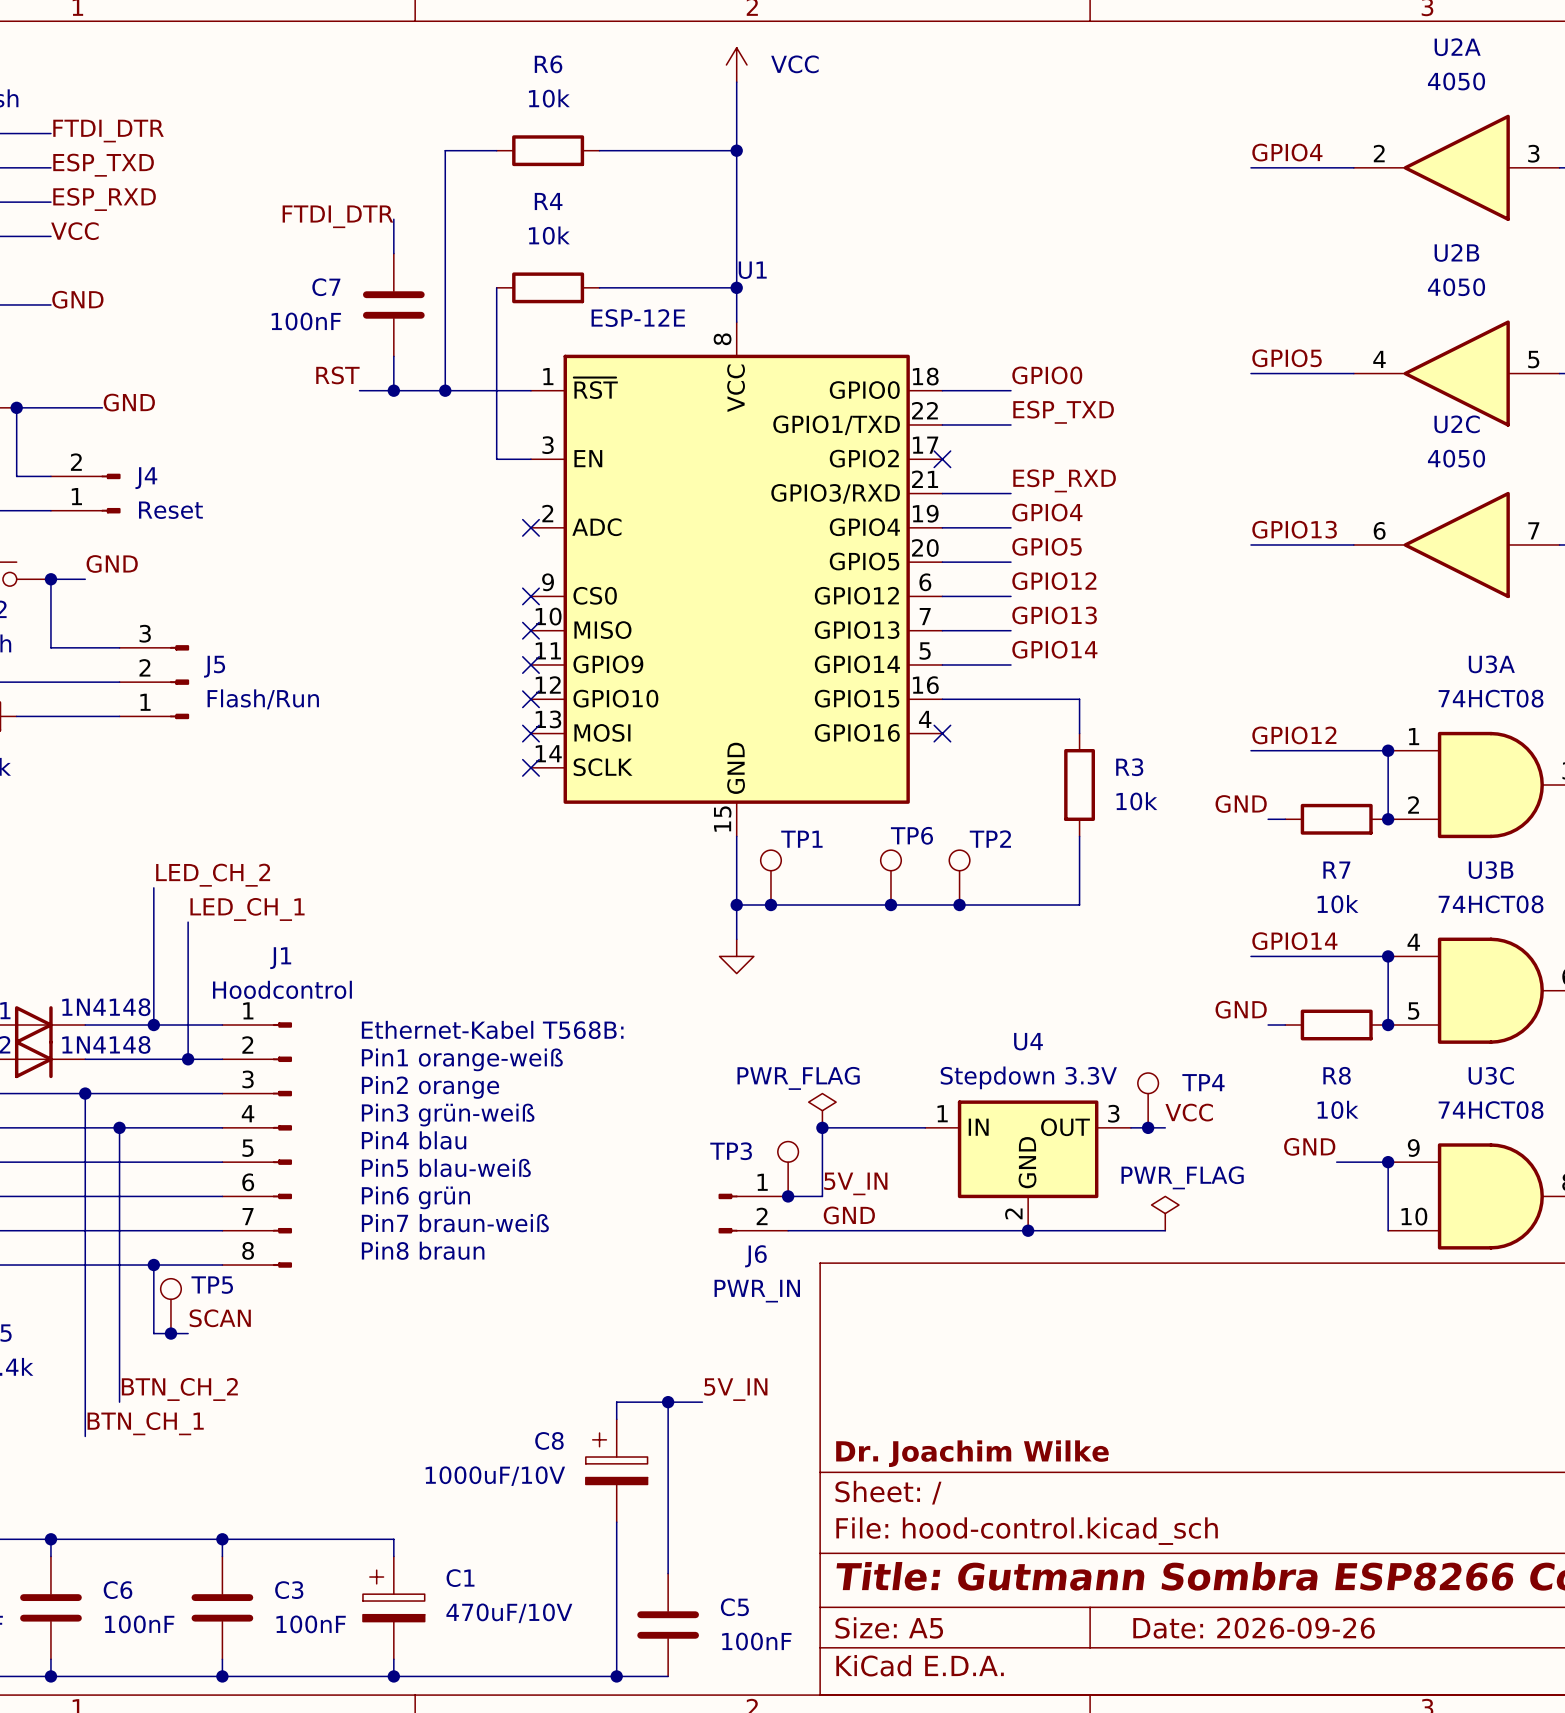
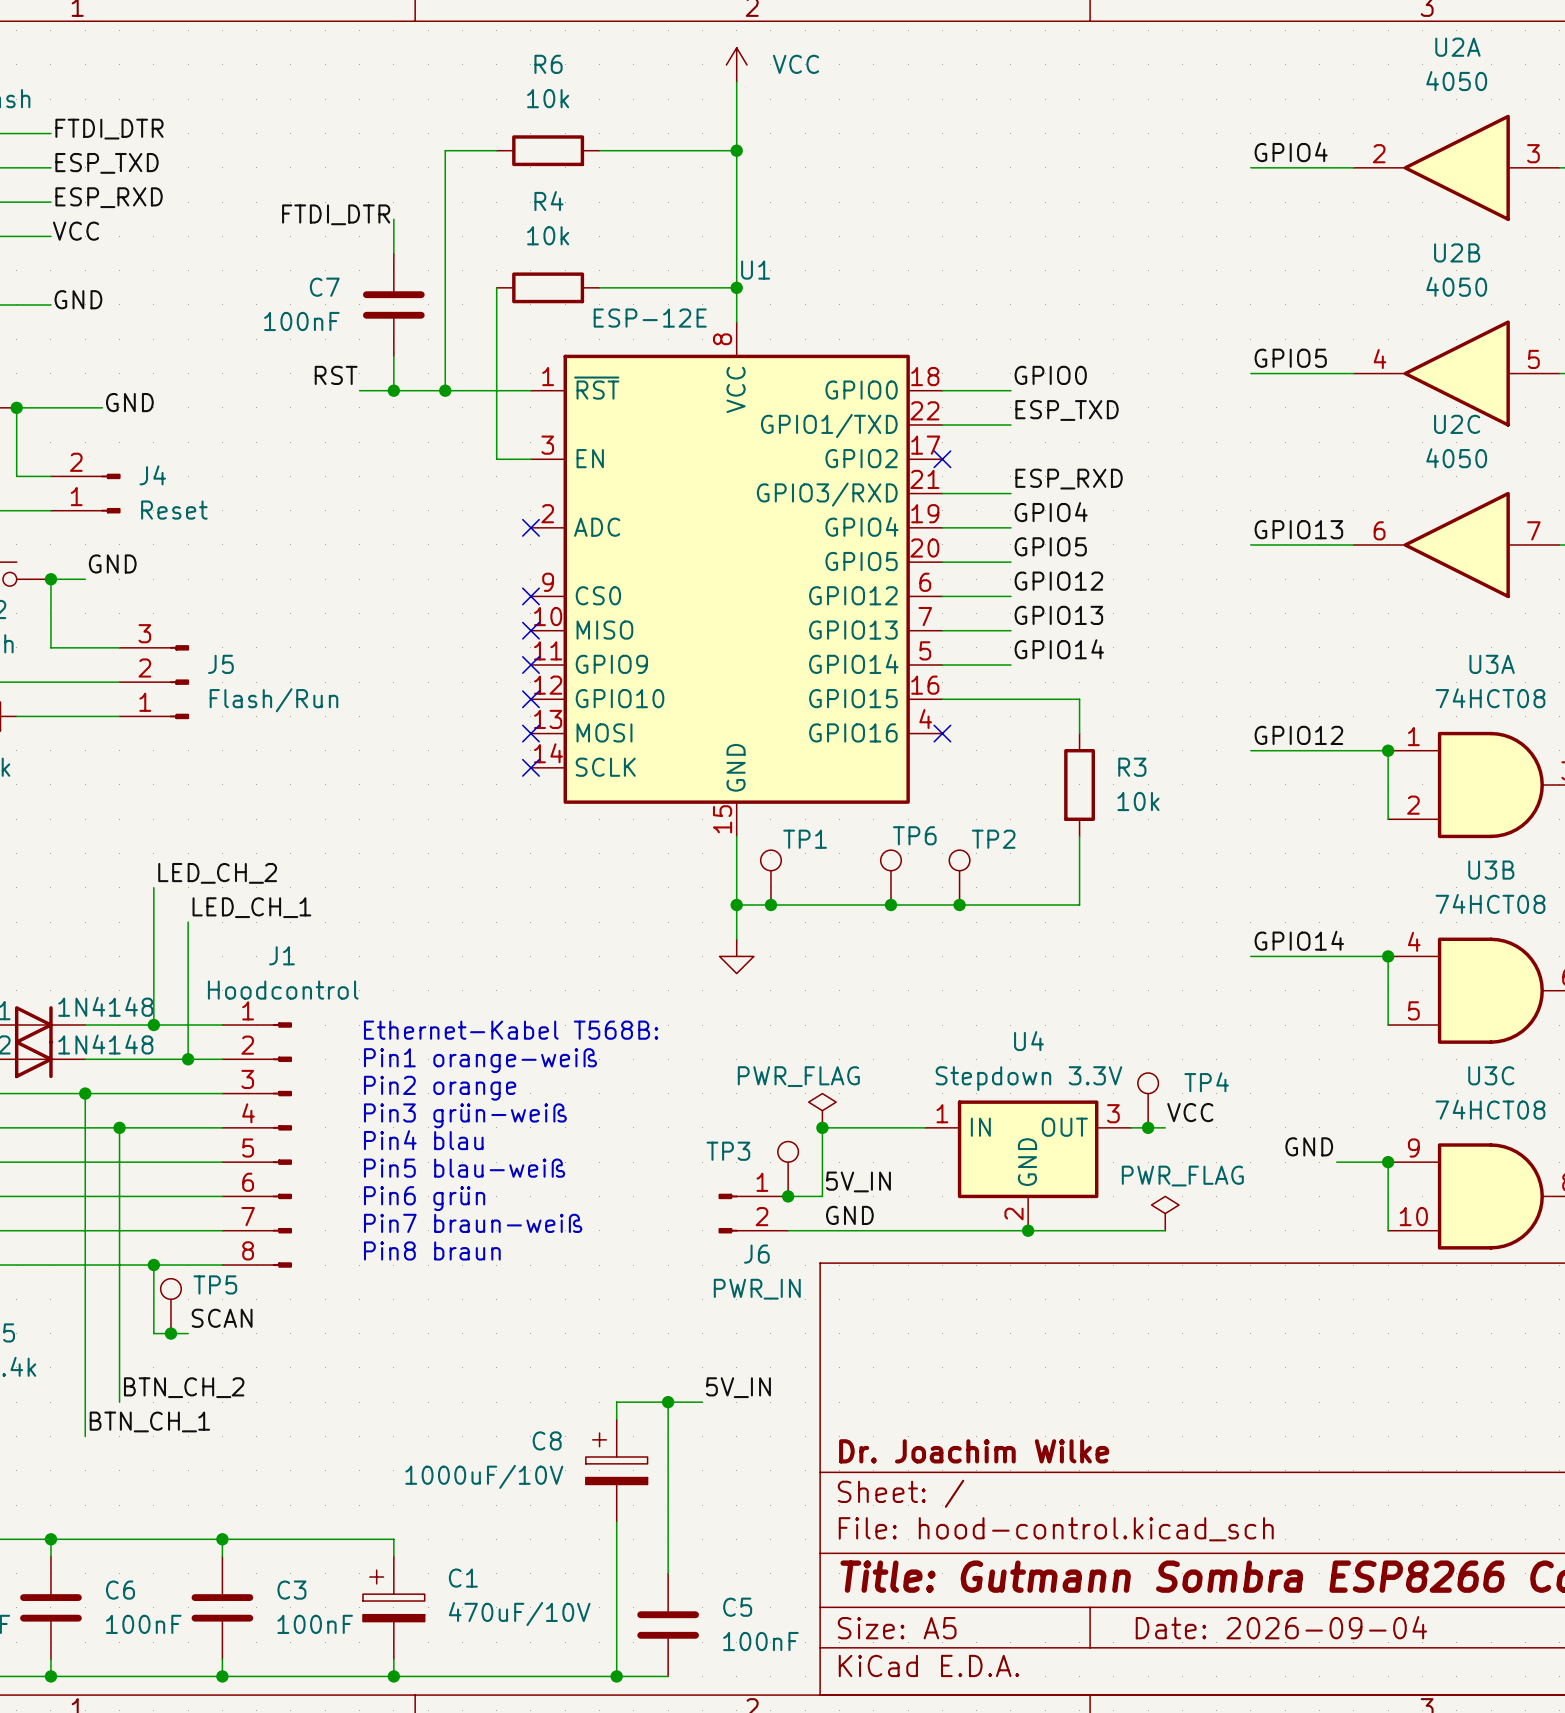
label: GND (1241, 804) -> none
wire: (1268, 819) (1285, 819) -> none
R7: 10k (1336, 819) -> none
junction: (1388, 819) -> none
label: GND (1241, 1009) -> none
wire: (1268, 1025) (1285, 1025) -> none
R8: 10k (1336, 1025) -> none
junction: (1388, 1025) -> none
title block: Date: 2026-09-26 (1254, 1628) -> Date: 2026-09-04 (1281, 1627)

